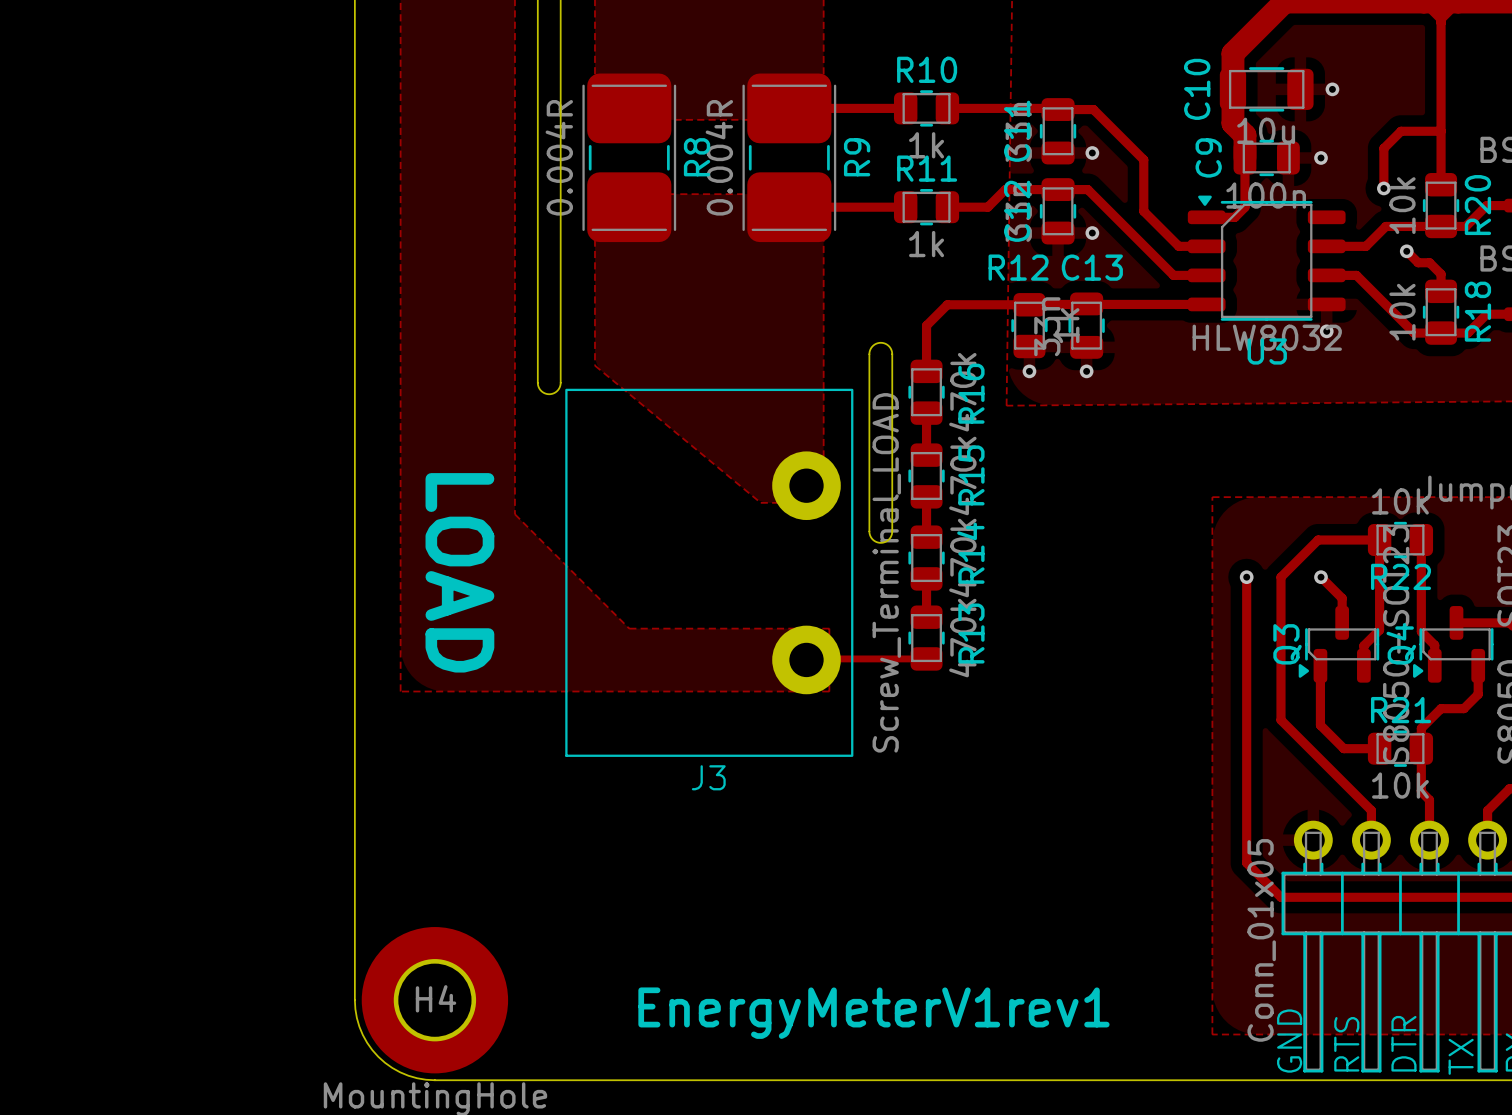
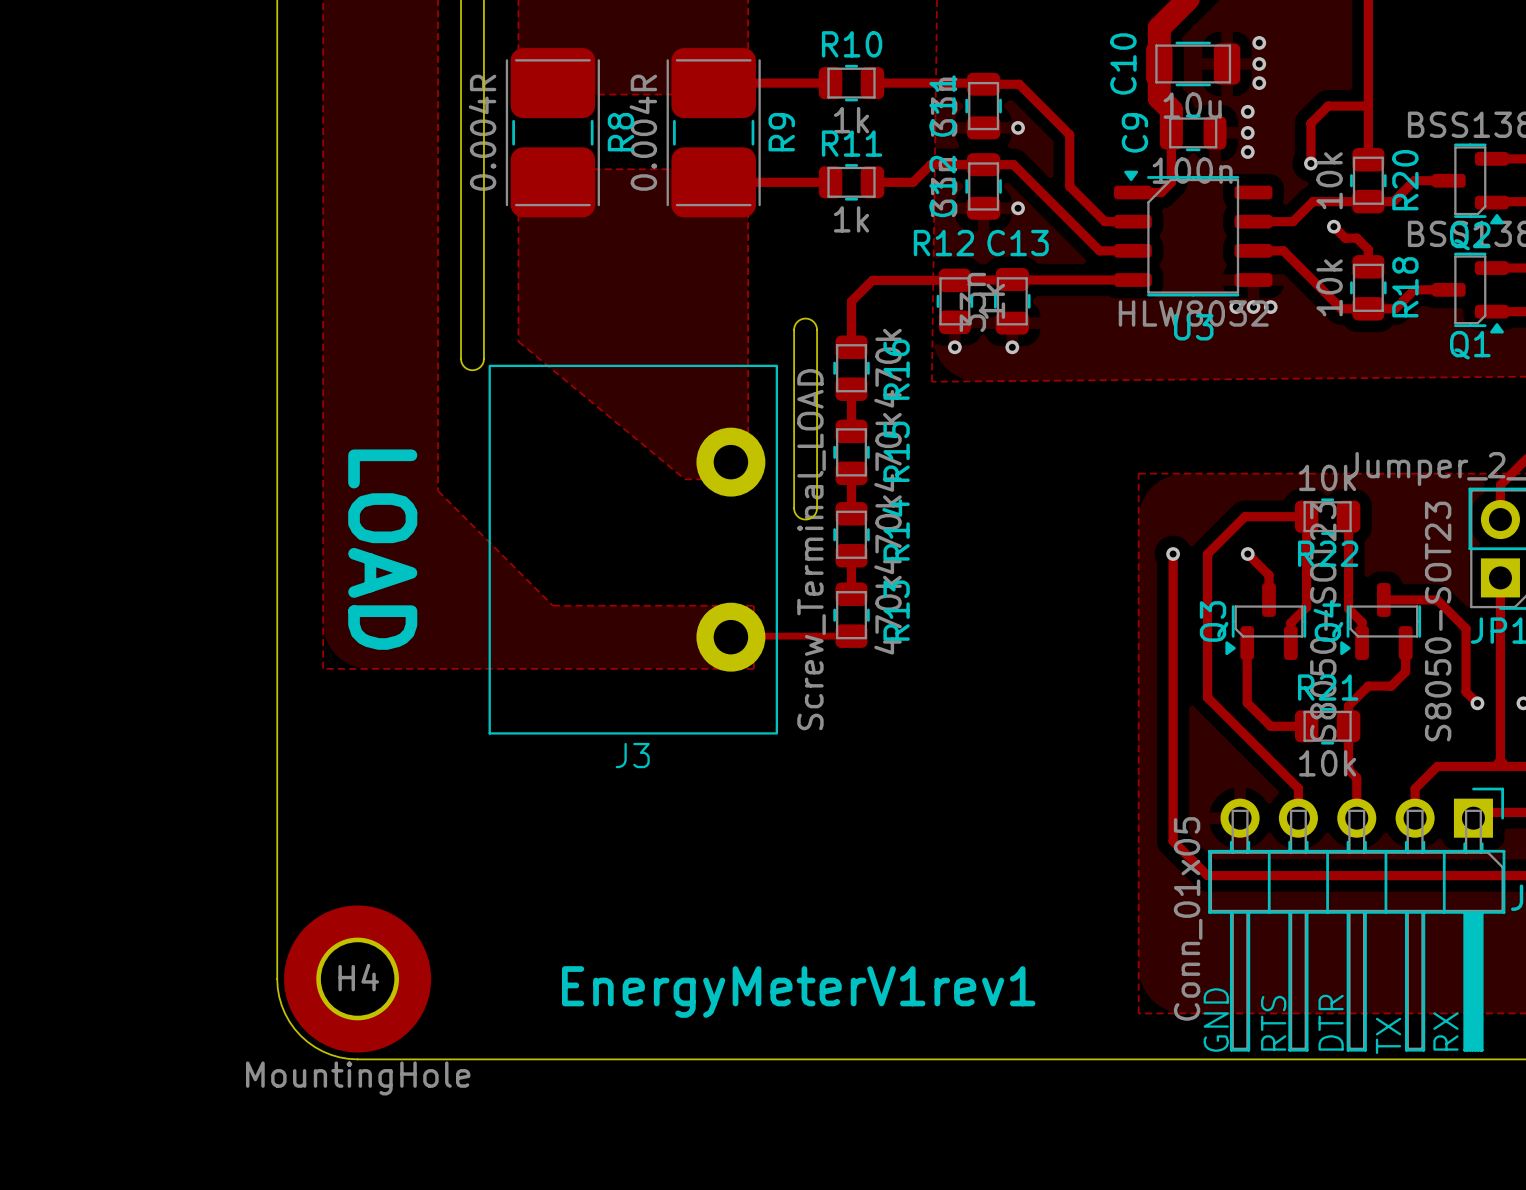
via: none -> (1259, 42)
via: none -> (1259, 83)
via: none -> (1247, 111)
via: none -> (1247, 152)
via: none -> (1236, 307)
via: none -> (1270, 307)

